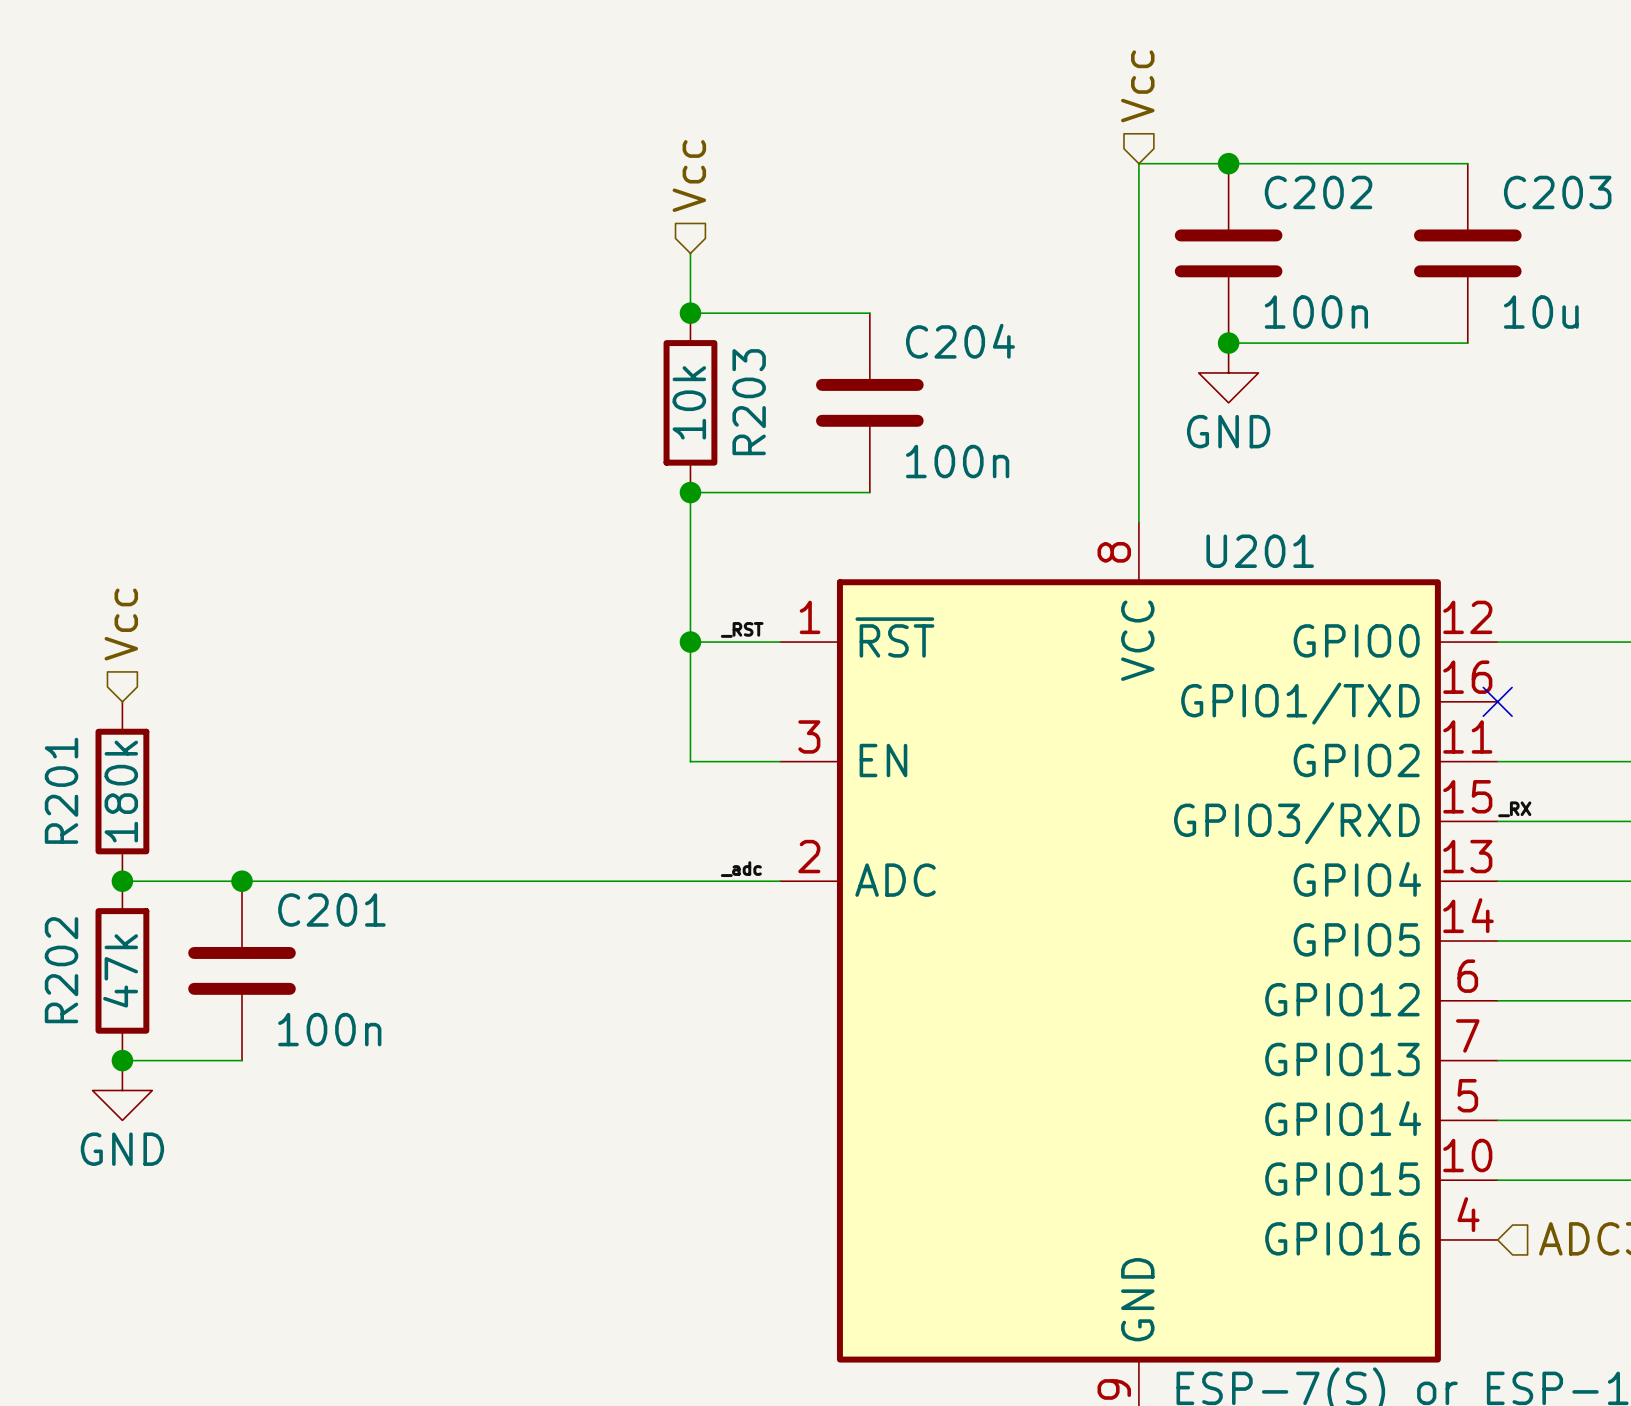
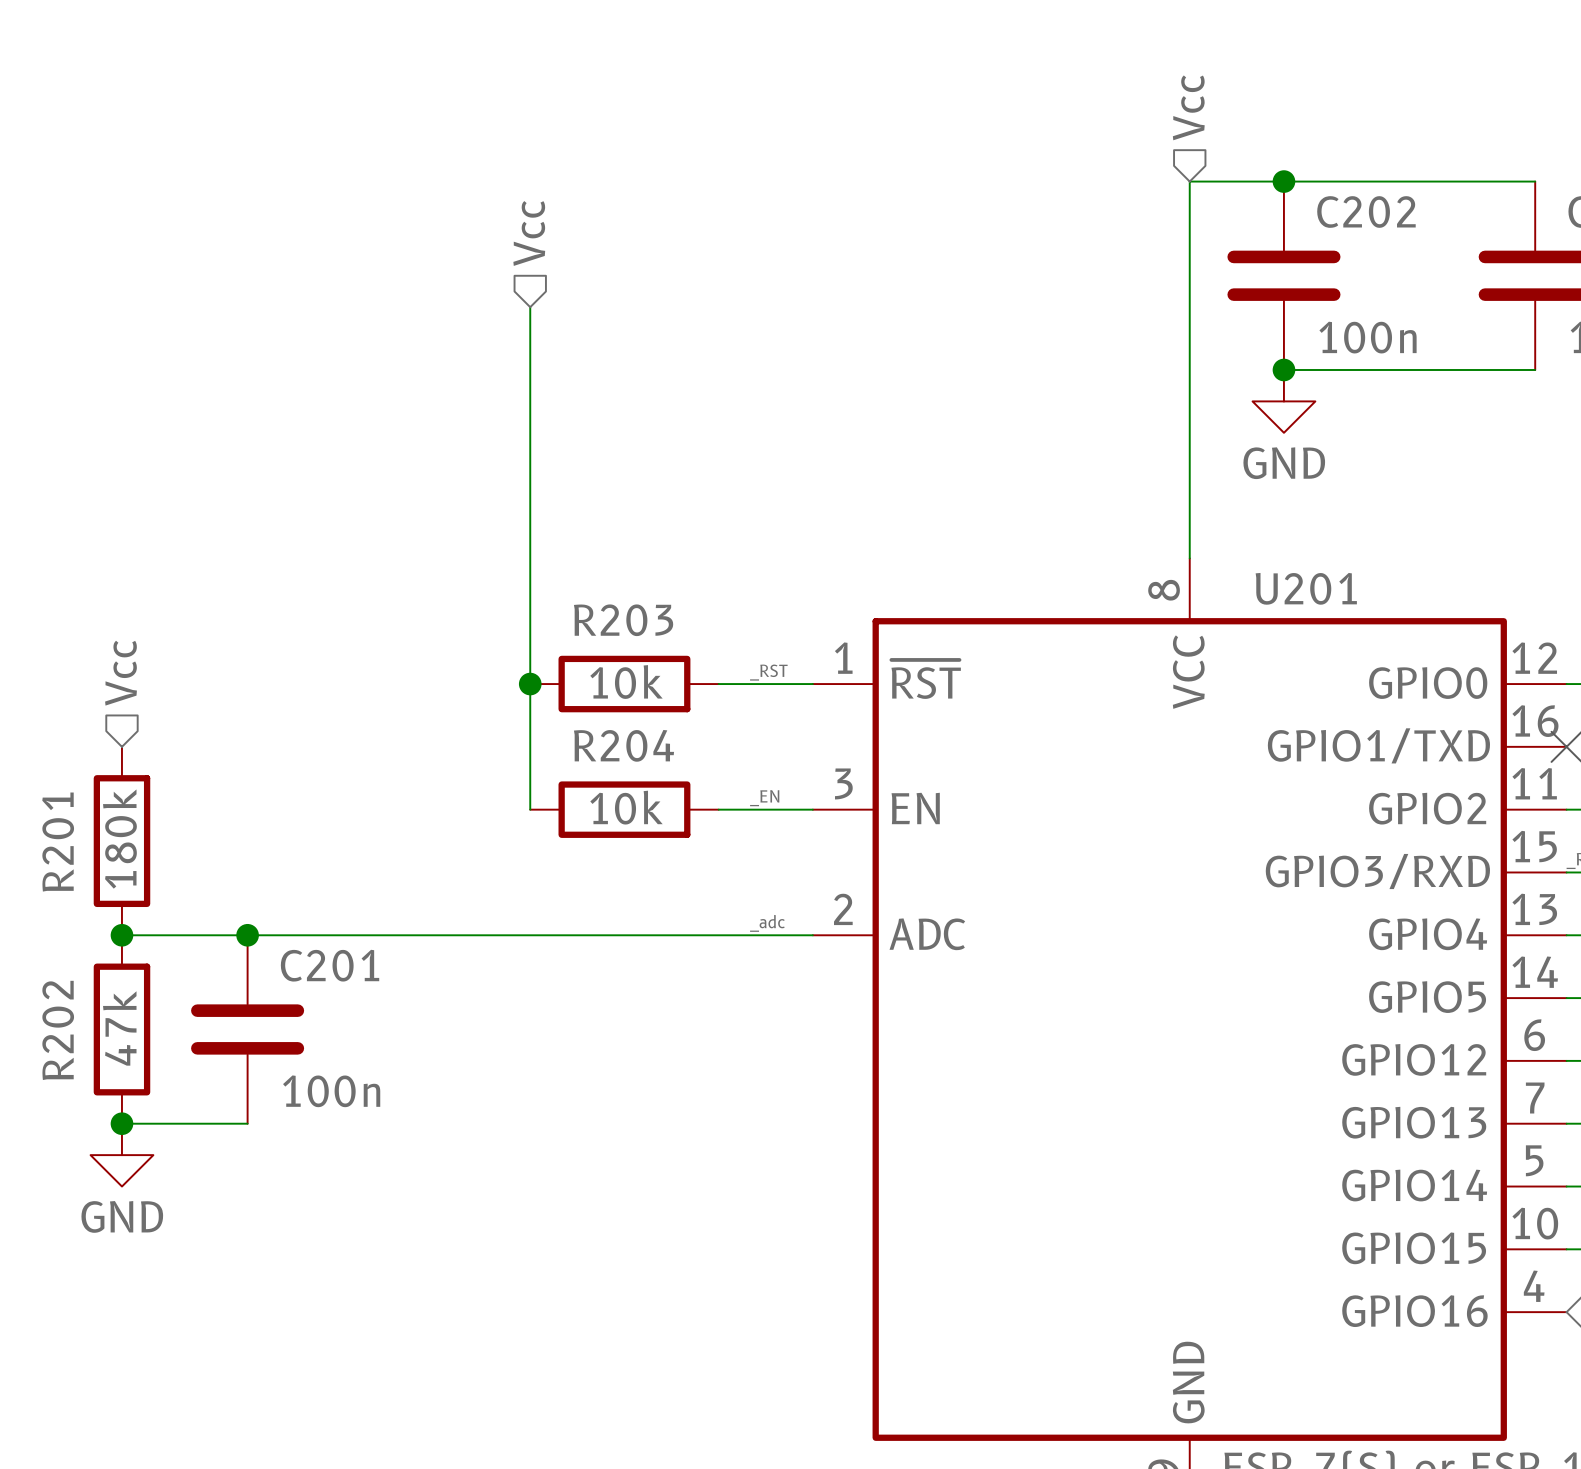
hierarchical label position: Vcc (689, 176) -> Vcc (529, 233)
wire: (690, 253) (690, 313) (869, 313) -> none
wire: none -> (530, 307) (530, 809)
junction: (690, 313) -> none
R203 rotation: 0° (690, 402) -> 90° clockwise (624, 684)
R203 position: (690, 402) -> (624, 684)
R203 name position: R203 (749, 402) -> R203 (623, 620)
C204: 100n (869, 402) -> none
junction: (690, 492) -> none
wire: (869, 492) (690, 492) (690, 761) -> none
junction: none -> (530, 684)
junction: (690, 642) -> none
label: none -> _EN (764, 798)
R204: none -> 10k (624, 809)

